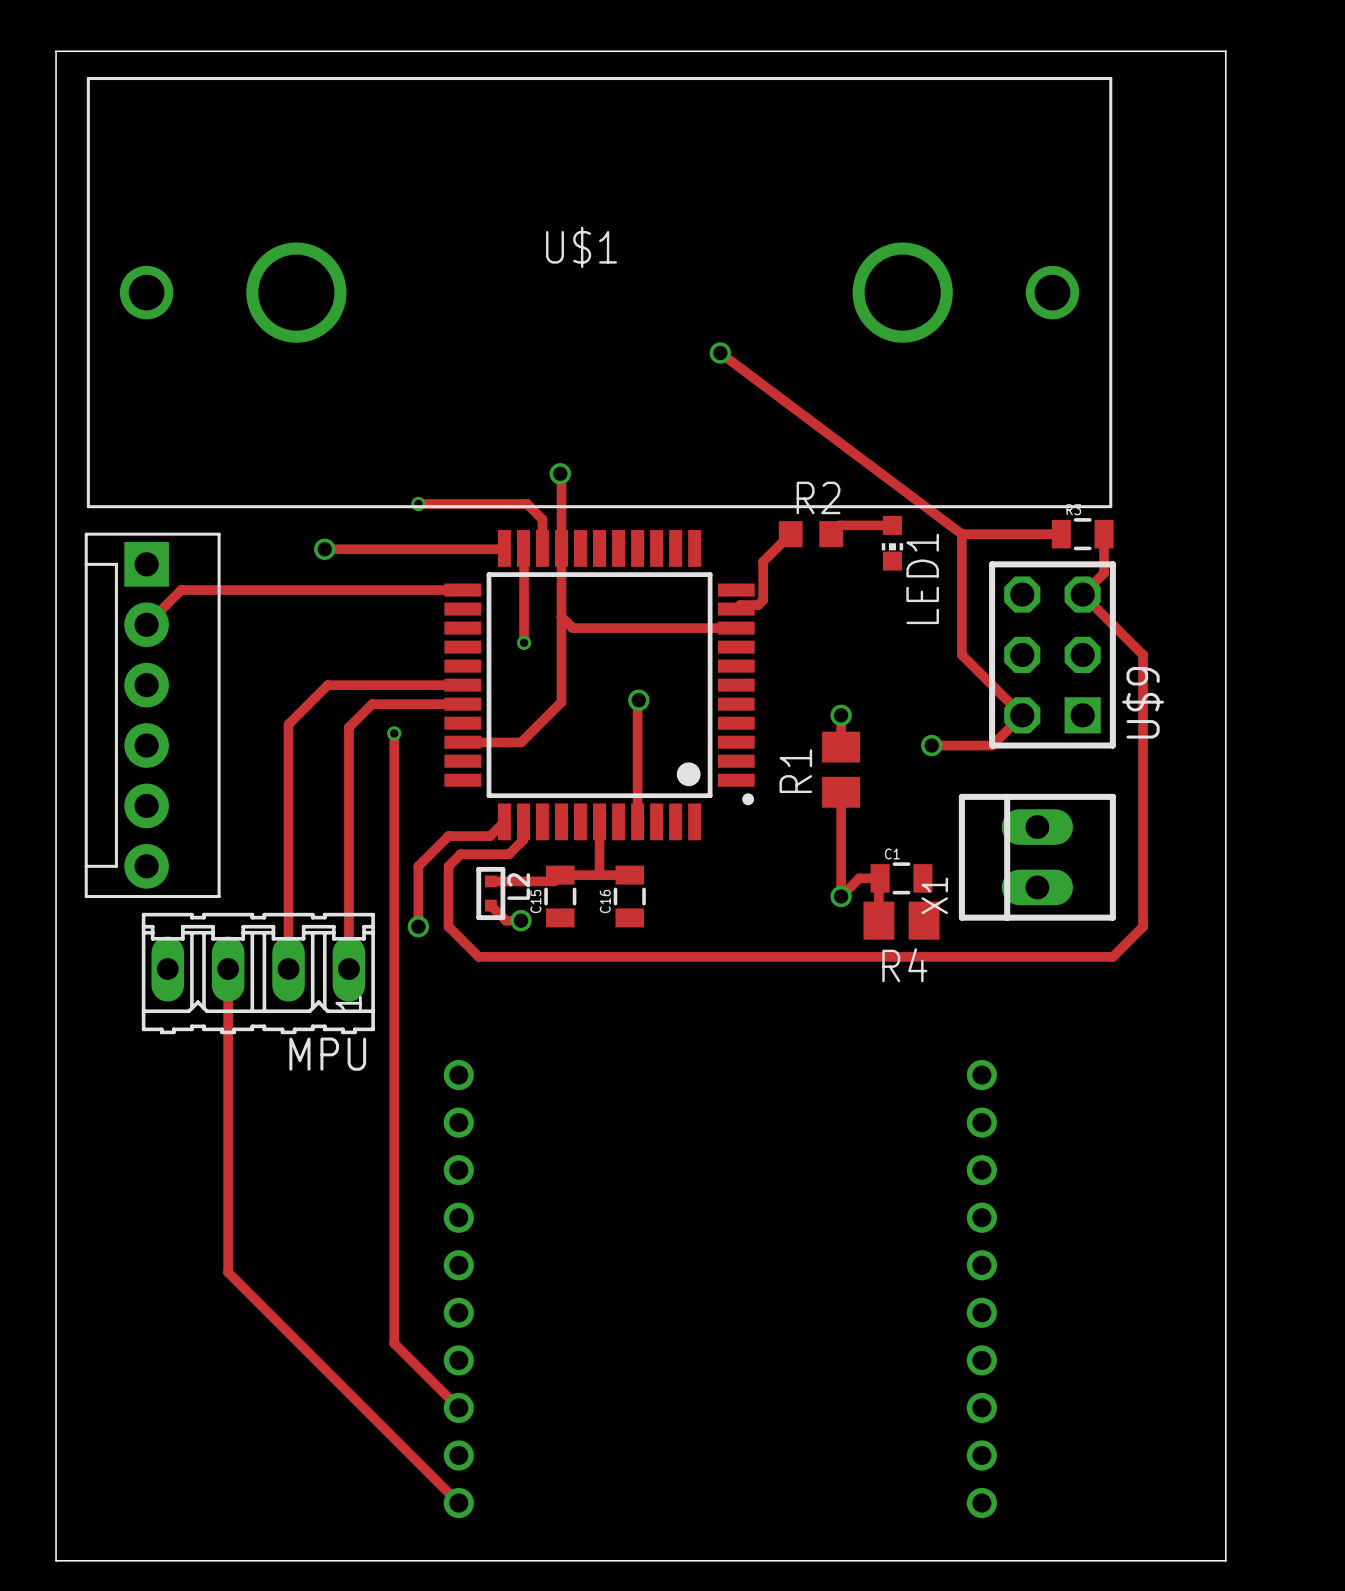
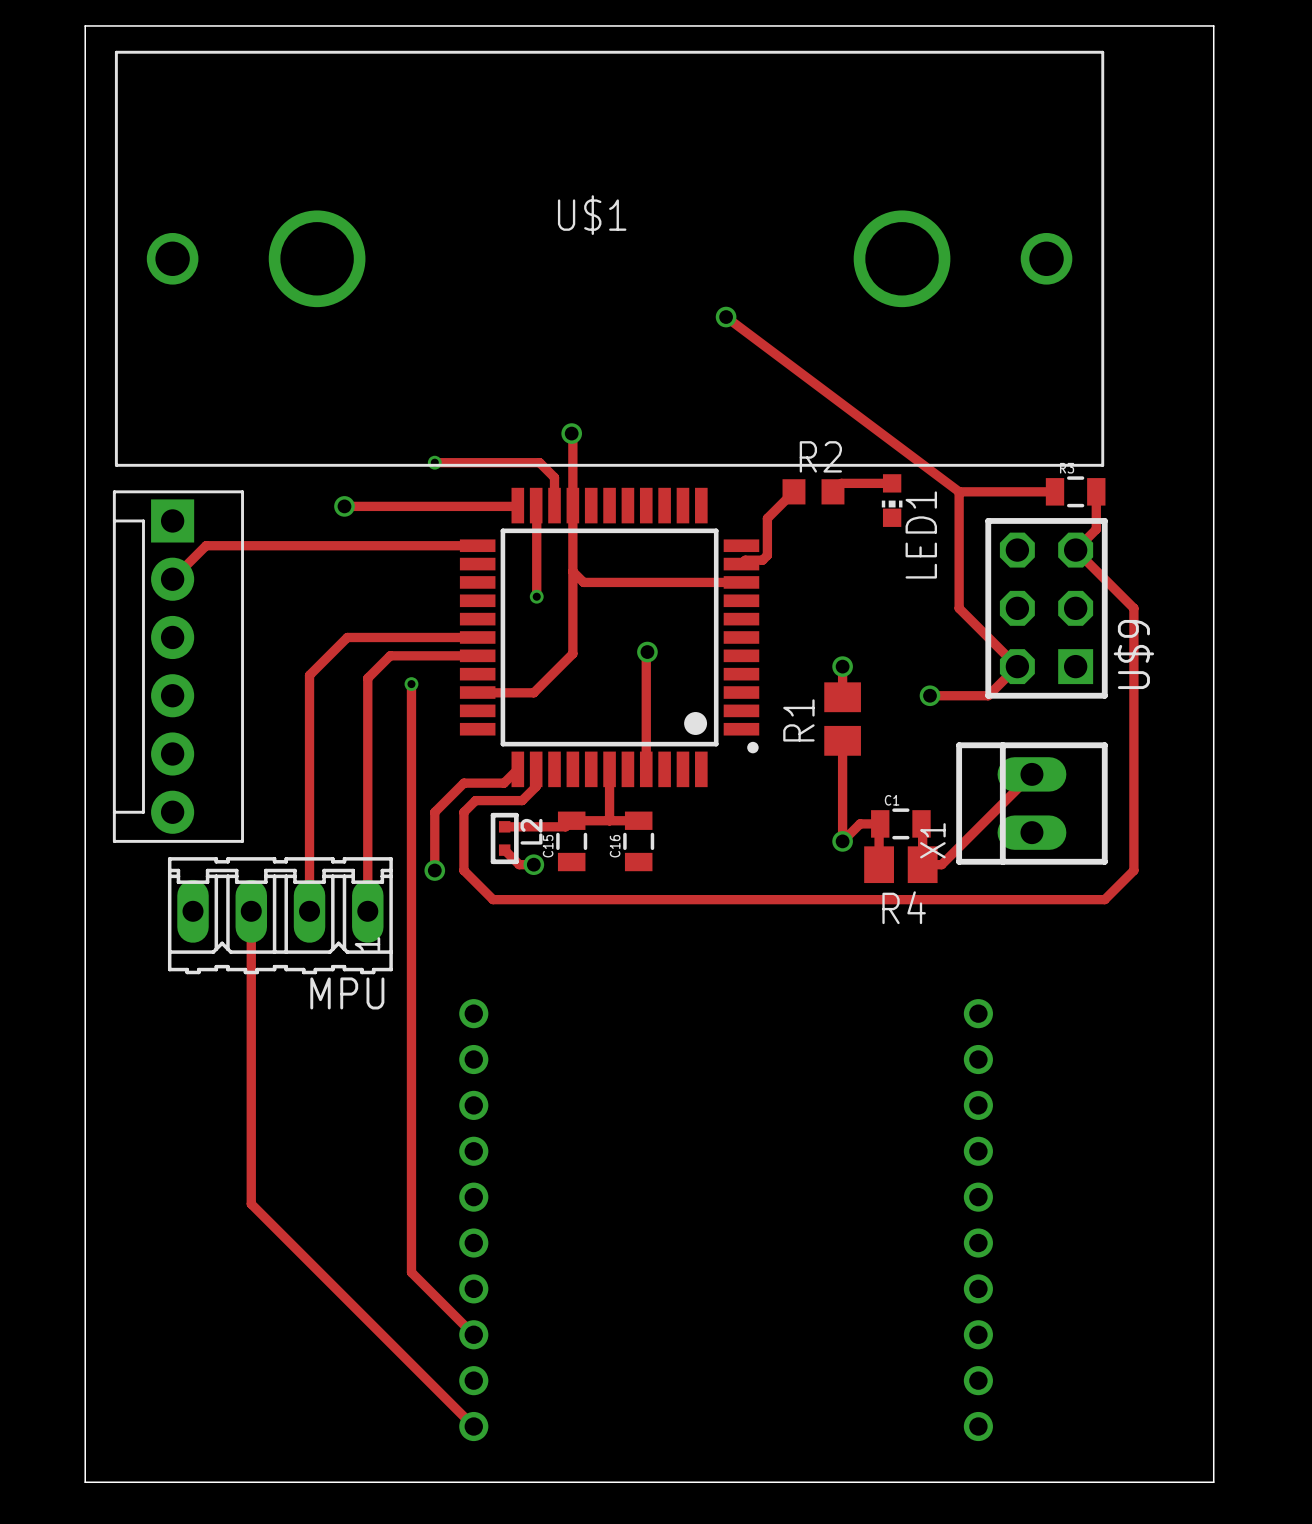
track: none -> (1031, 774) (941, 864) (922, 864) (922, 825)

